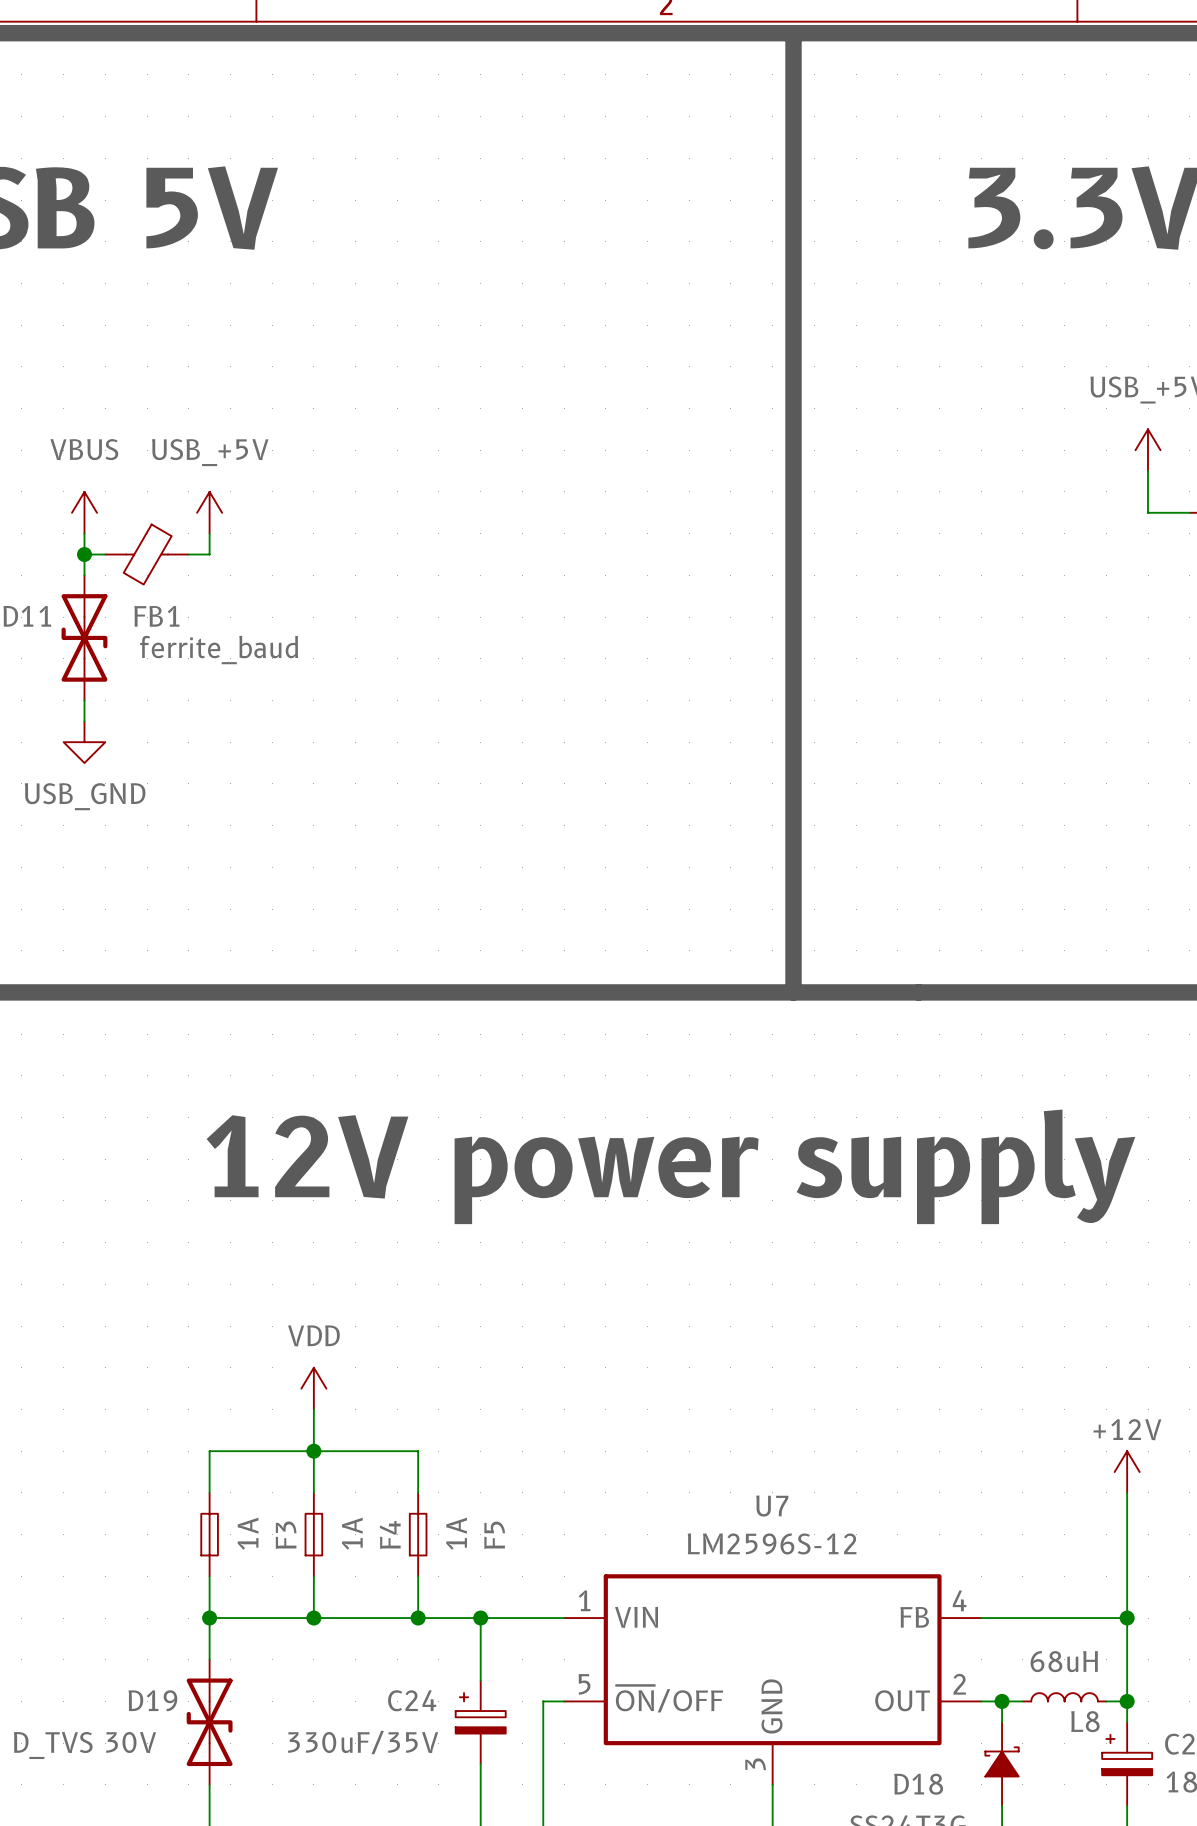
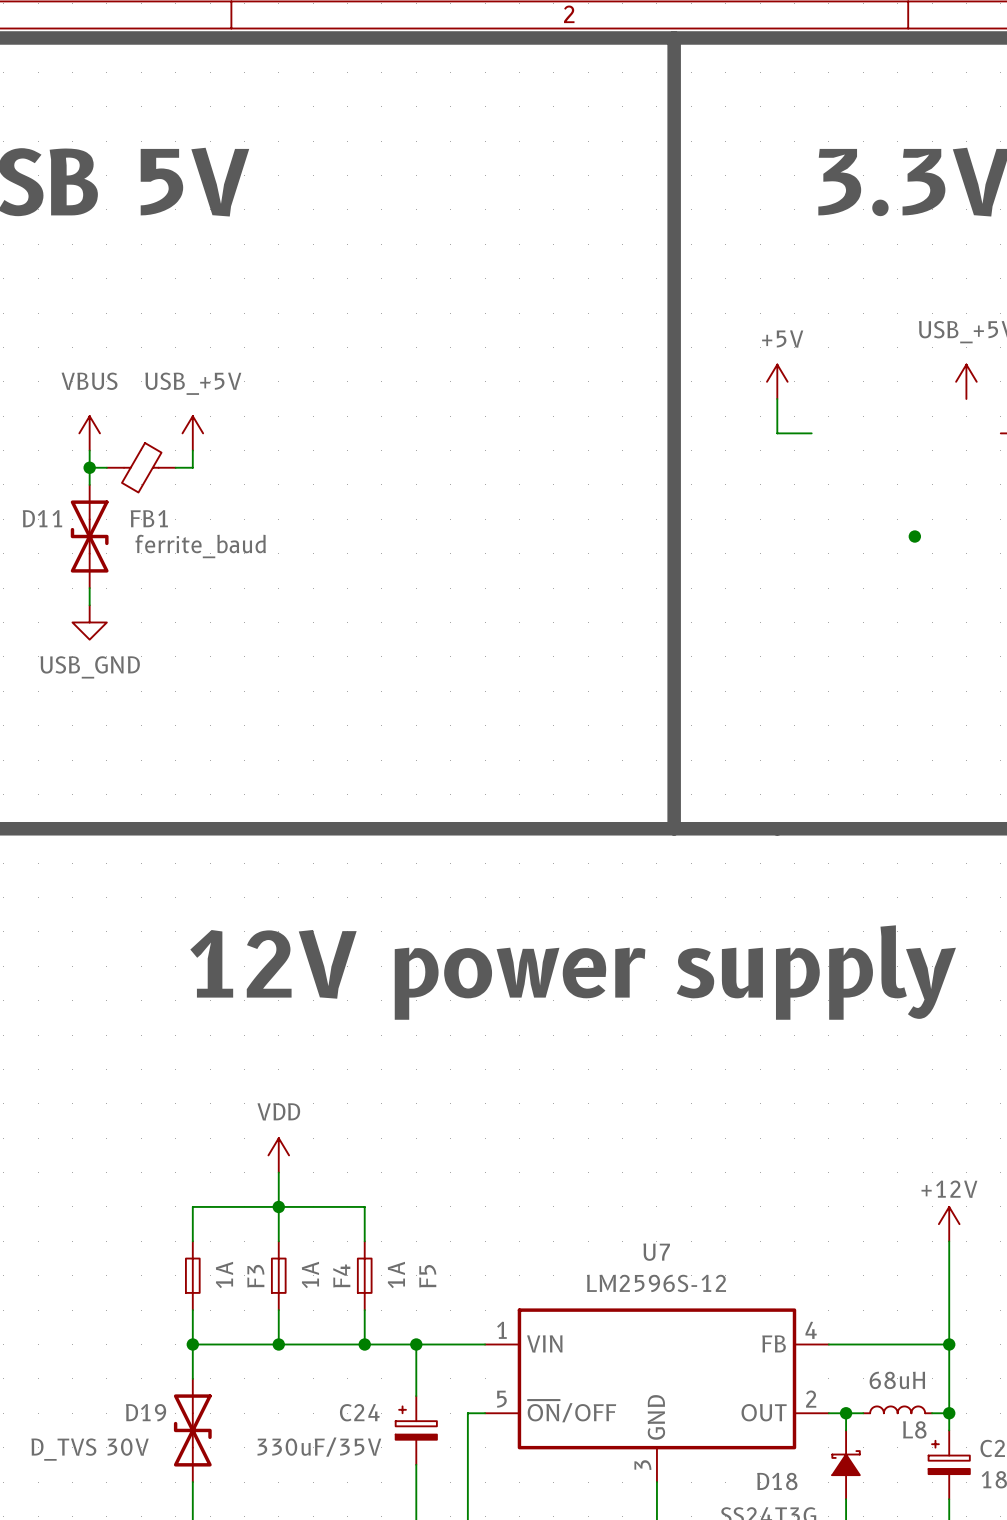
power symbol: none -> +5V (777, 381)
wire: (1148, 471) (1148, 512) (1189, 512) -> (777, 398) (777, 433) (811, 433)
junction: none -> (914, 536)

